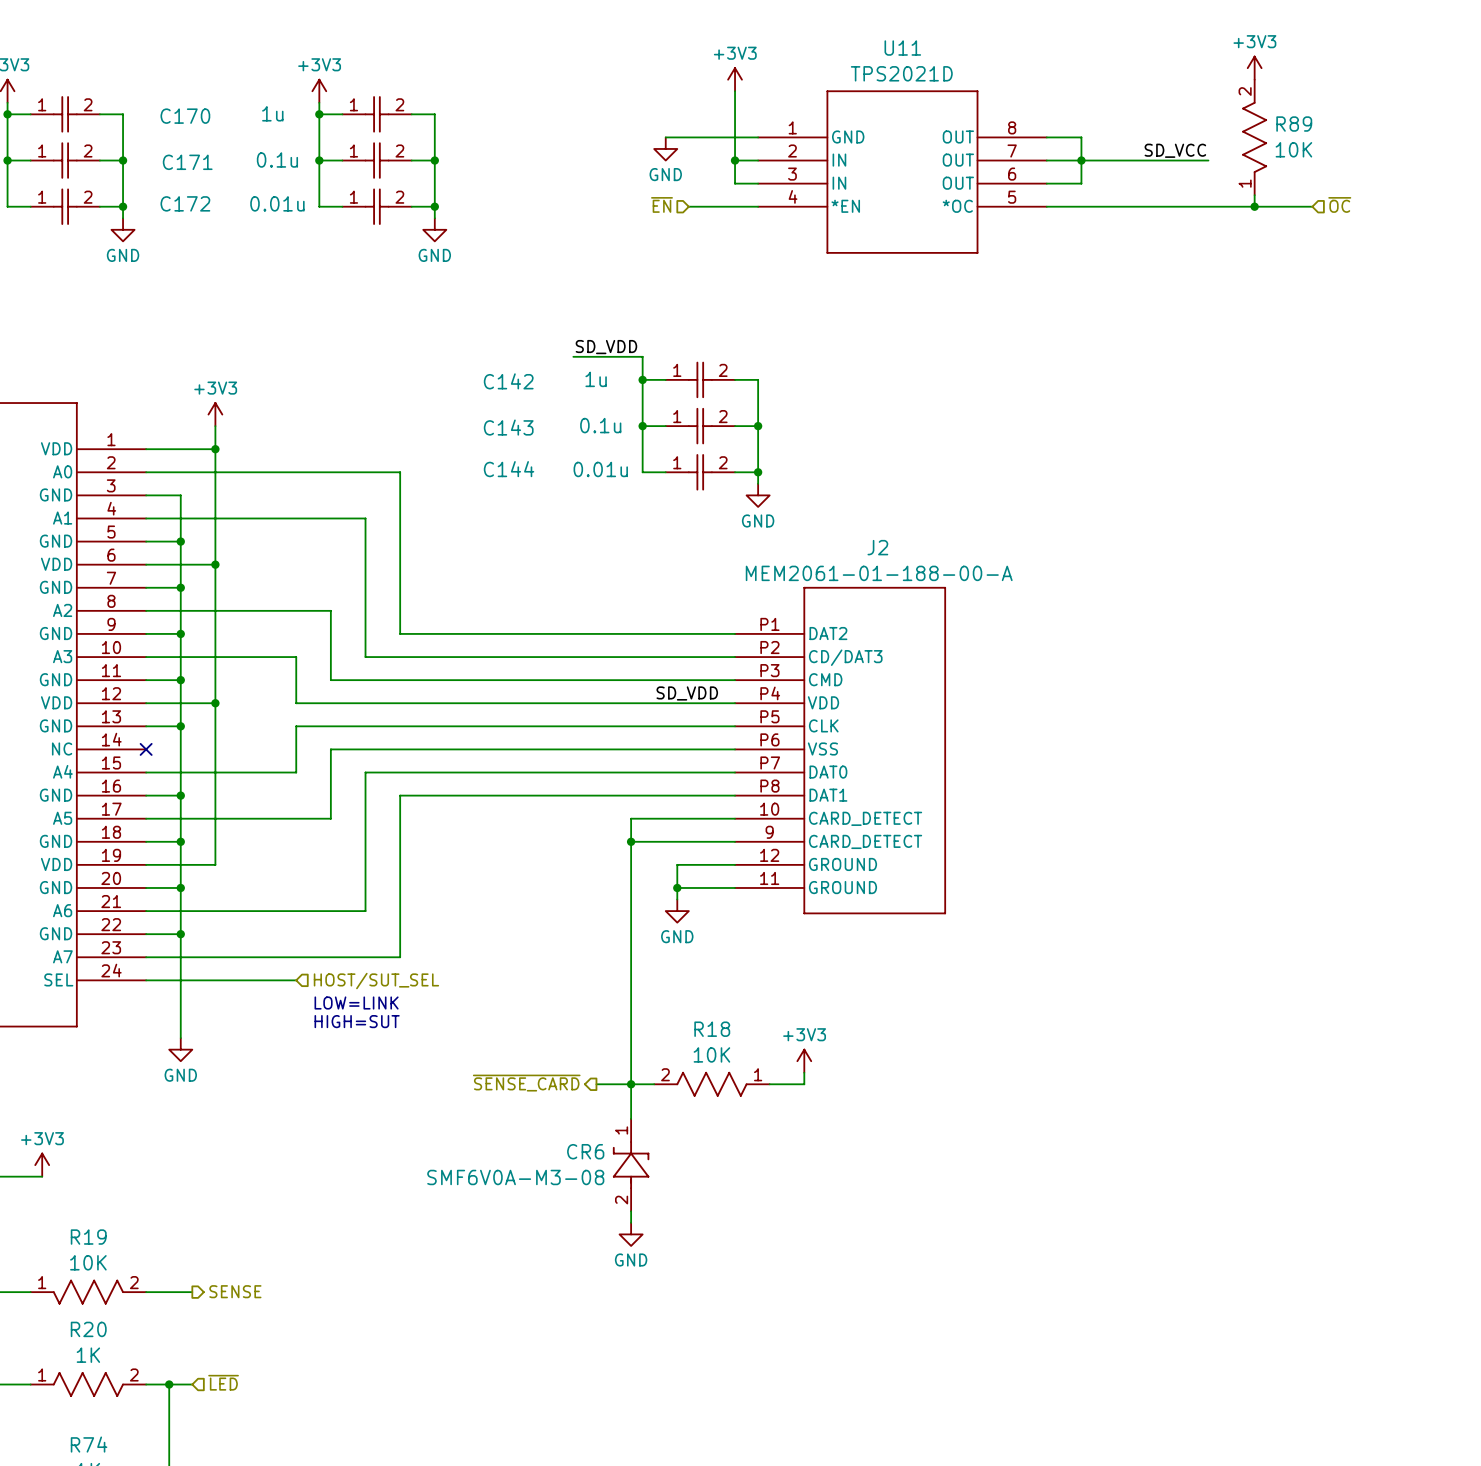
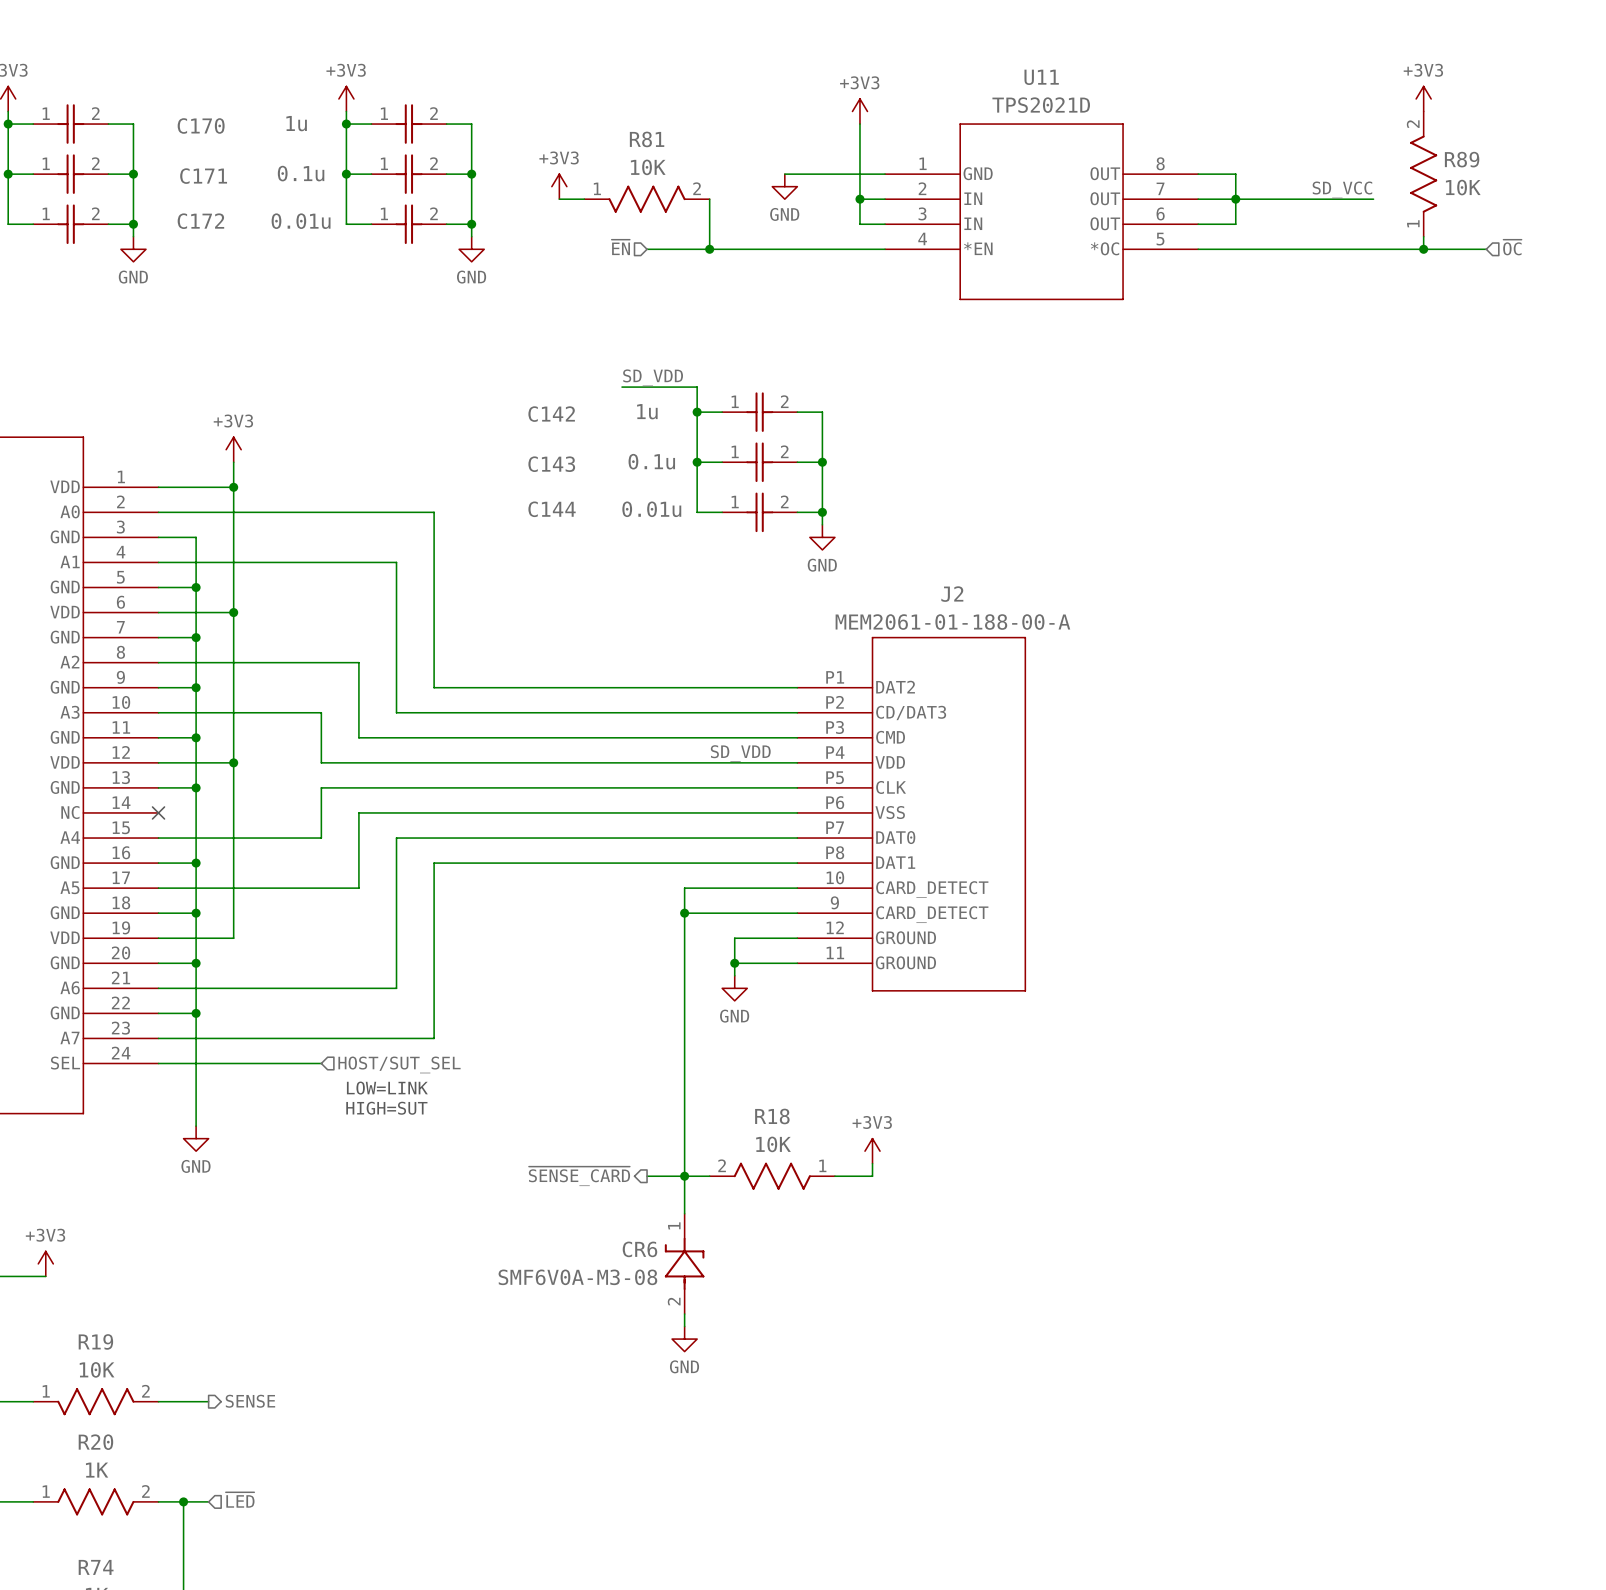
power symbol position: +3V3 (1254, 68) -> +3V3 (1423, 98)
power symbol position: +3V3 (735, 79) -> +3V3 (859, 111)
wire: (735, 91) (735, 183) (758, 183) -> (859, 124) (859, 224) (885, 224)
wire: (665, 137) (758, 137) -> none
wire: (1046, 137) (1081, 137) (1081, 183) (1046, 183) -> none
R89 position: (1254, 137) -> (1423, 174)
power symbol position: GND (665, 148) -> GND (784, 186)
label position: SD_VCC (1175, 150) -> SD_VCC (1342, 189)
wire: none -> (784, 174) (797, 174)
junction: (735, 160) -> none
junction: (1081, 160) -> none
wire: (1139, 160) (1208, 160) -> (1235, 174) (1235, 224)
power symbol: none -> +3V3 (559, 186)
U11 position: (902, 172) -> (1041, 211)
wire: none -> (559, 199) (584, 199)
R81: none -> 10K (647, 199)
wire: none -> (709, 199) (709, 249)
junction: none -> (859, 199)
wire: none -> (1198, 199) (1373, 199)
junction: none -> (1235, 199)
wire: (1254, 195) (1254, 206) -> (1423, 236) (1423, 249)
hierarchical label position: ~{EN} (661, 204) -> ~{EN} (620, 247)
hierarchical label position: ~{OC} (1339, 204) -> ~{OC} (1512, 247)
wire: (688, 206) (758, 206) -> none
wire: (1139, 206) (1312, 206) -> none
junction: (1254, 206) -> none
wire: none -> (647, 249) (885, 249)
junction: none -> (709, 249)
wire: none -> (1198, 249) (1486, 249)
junction: none -> (1423, 249)

